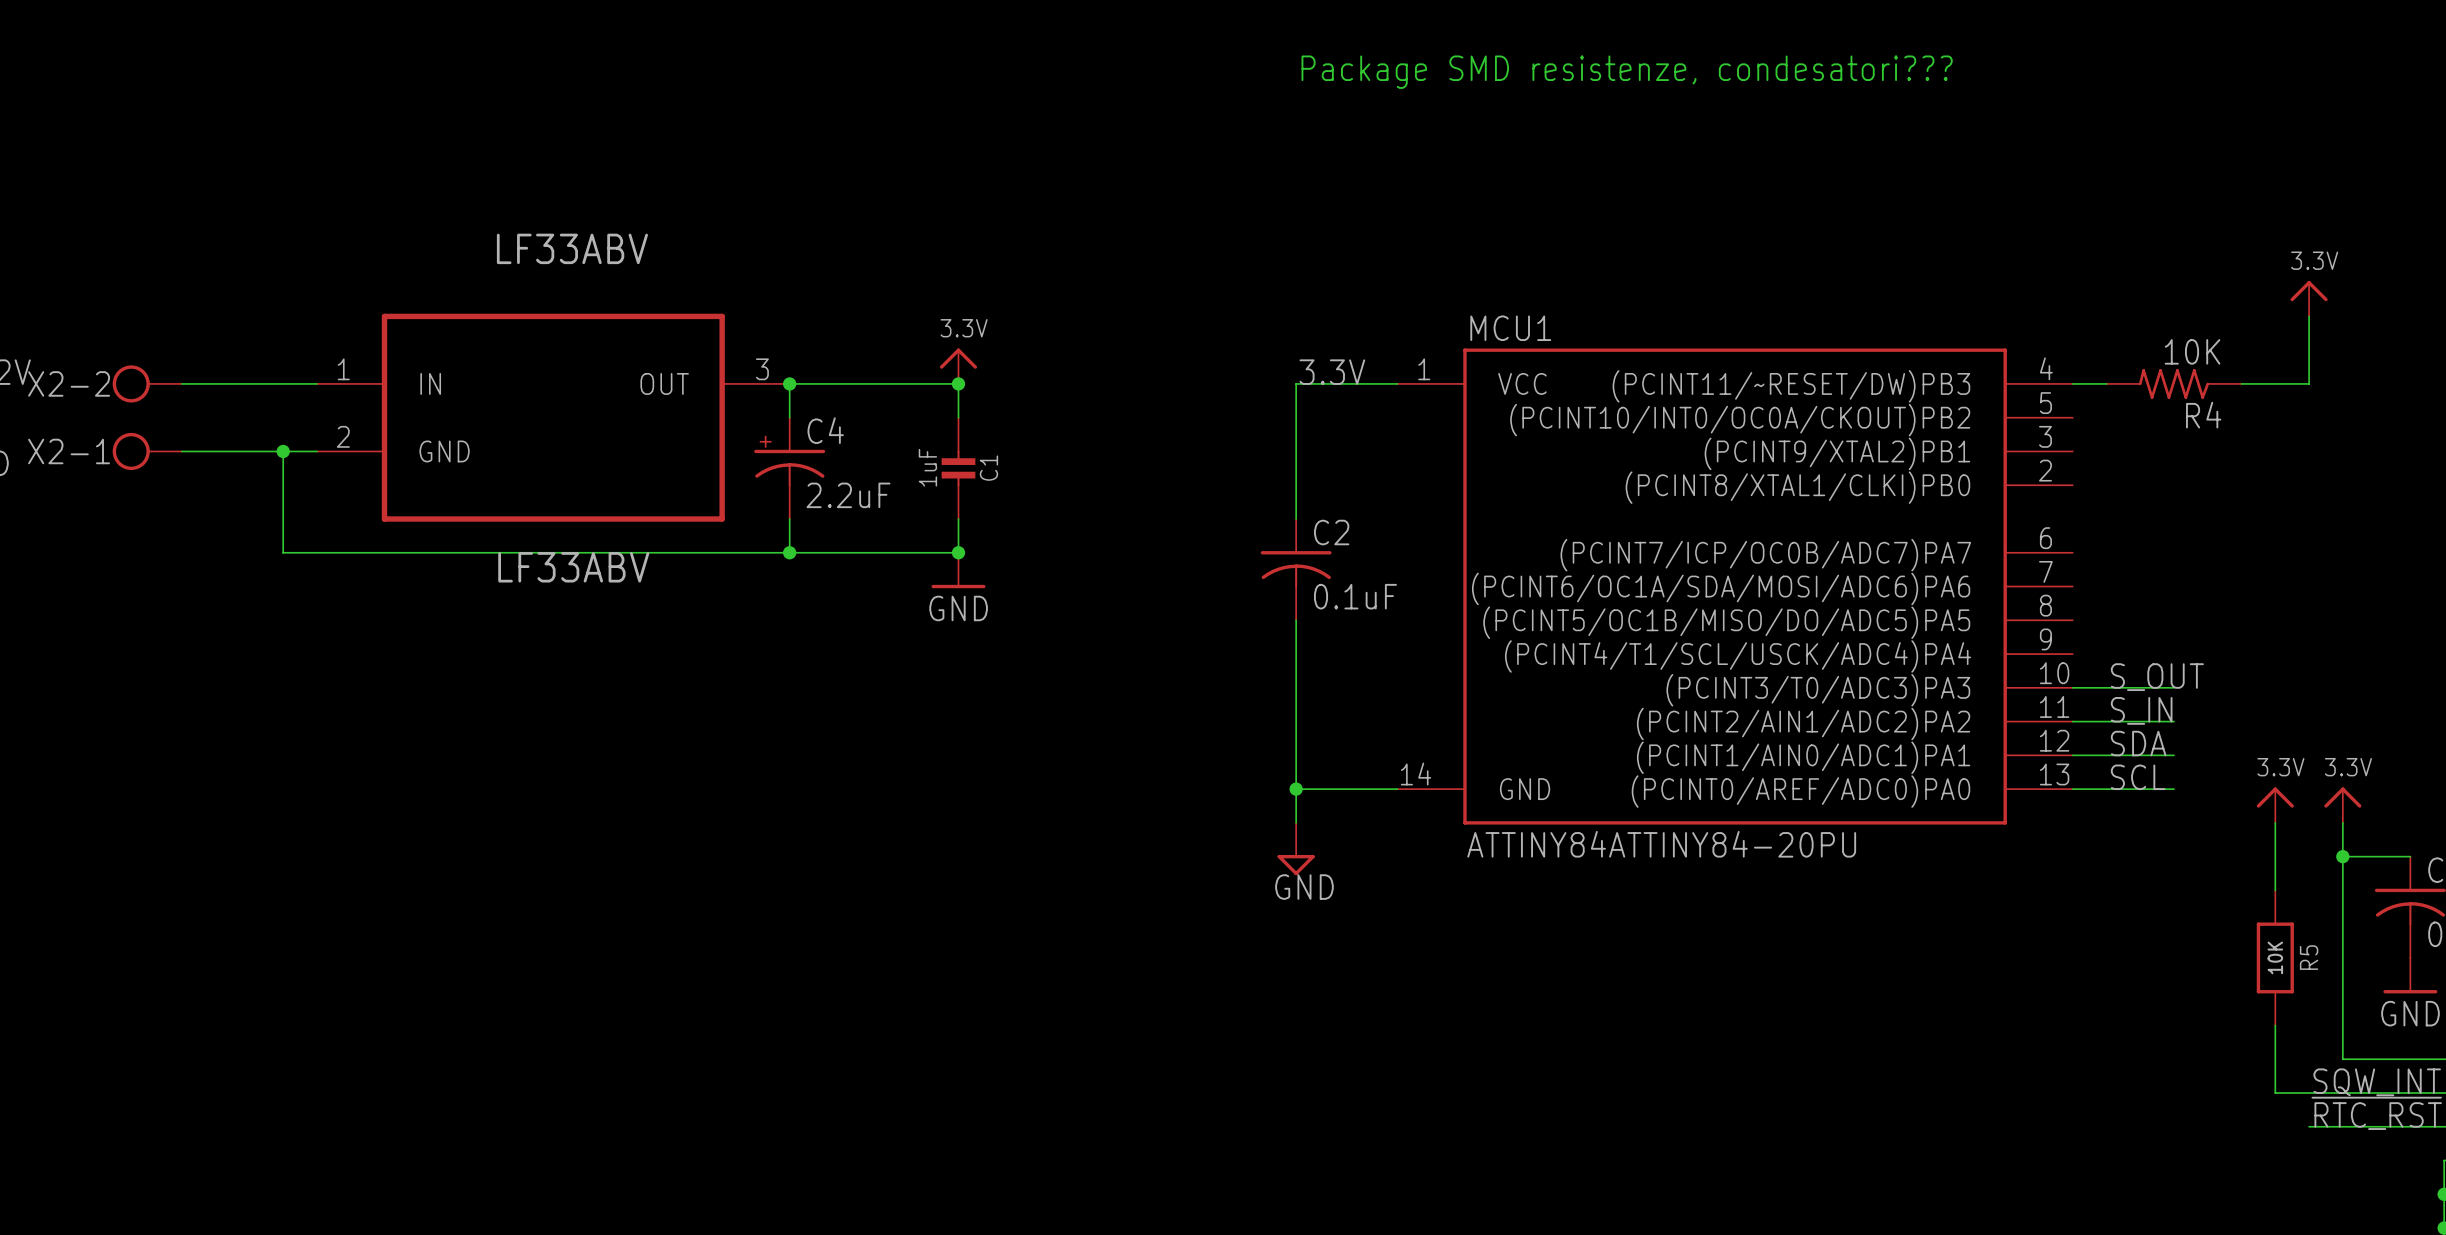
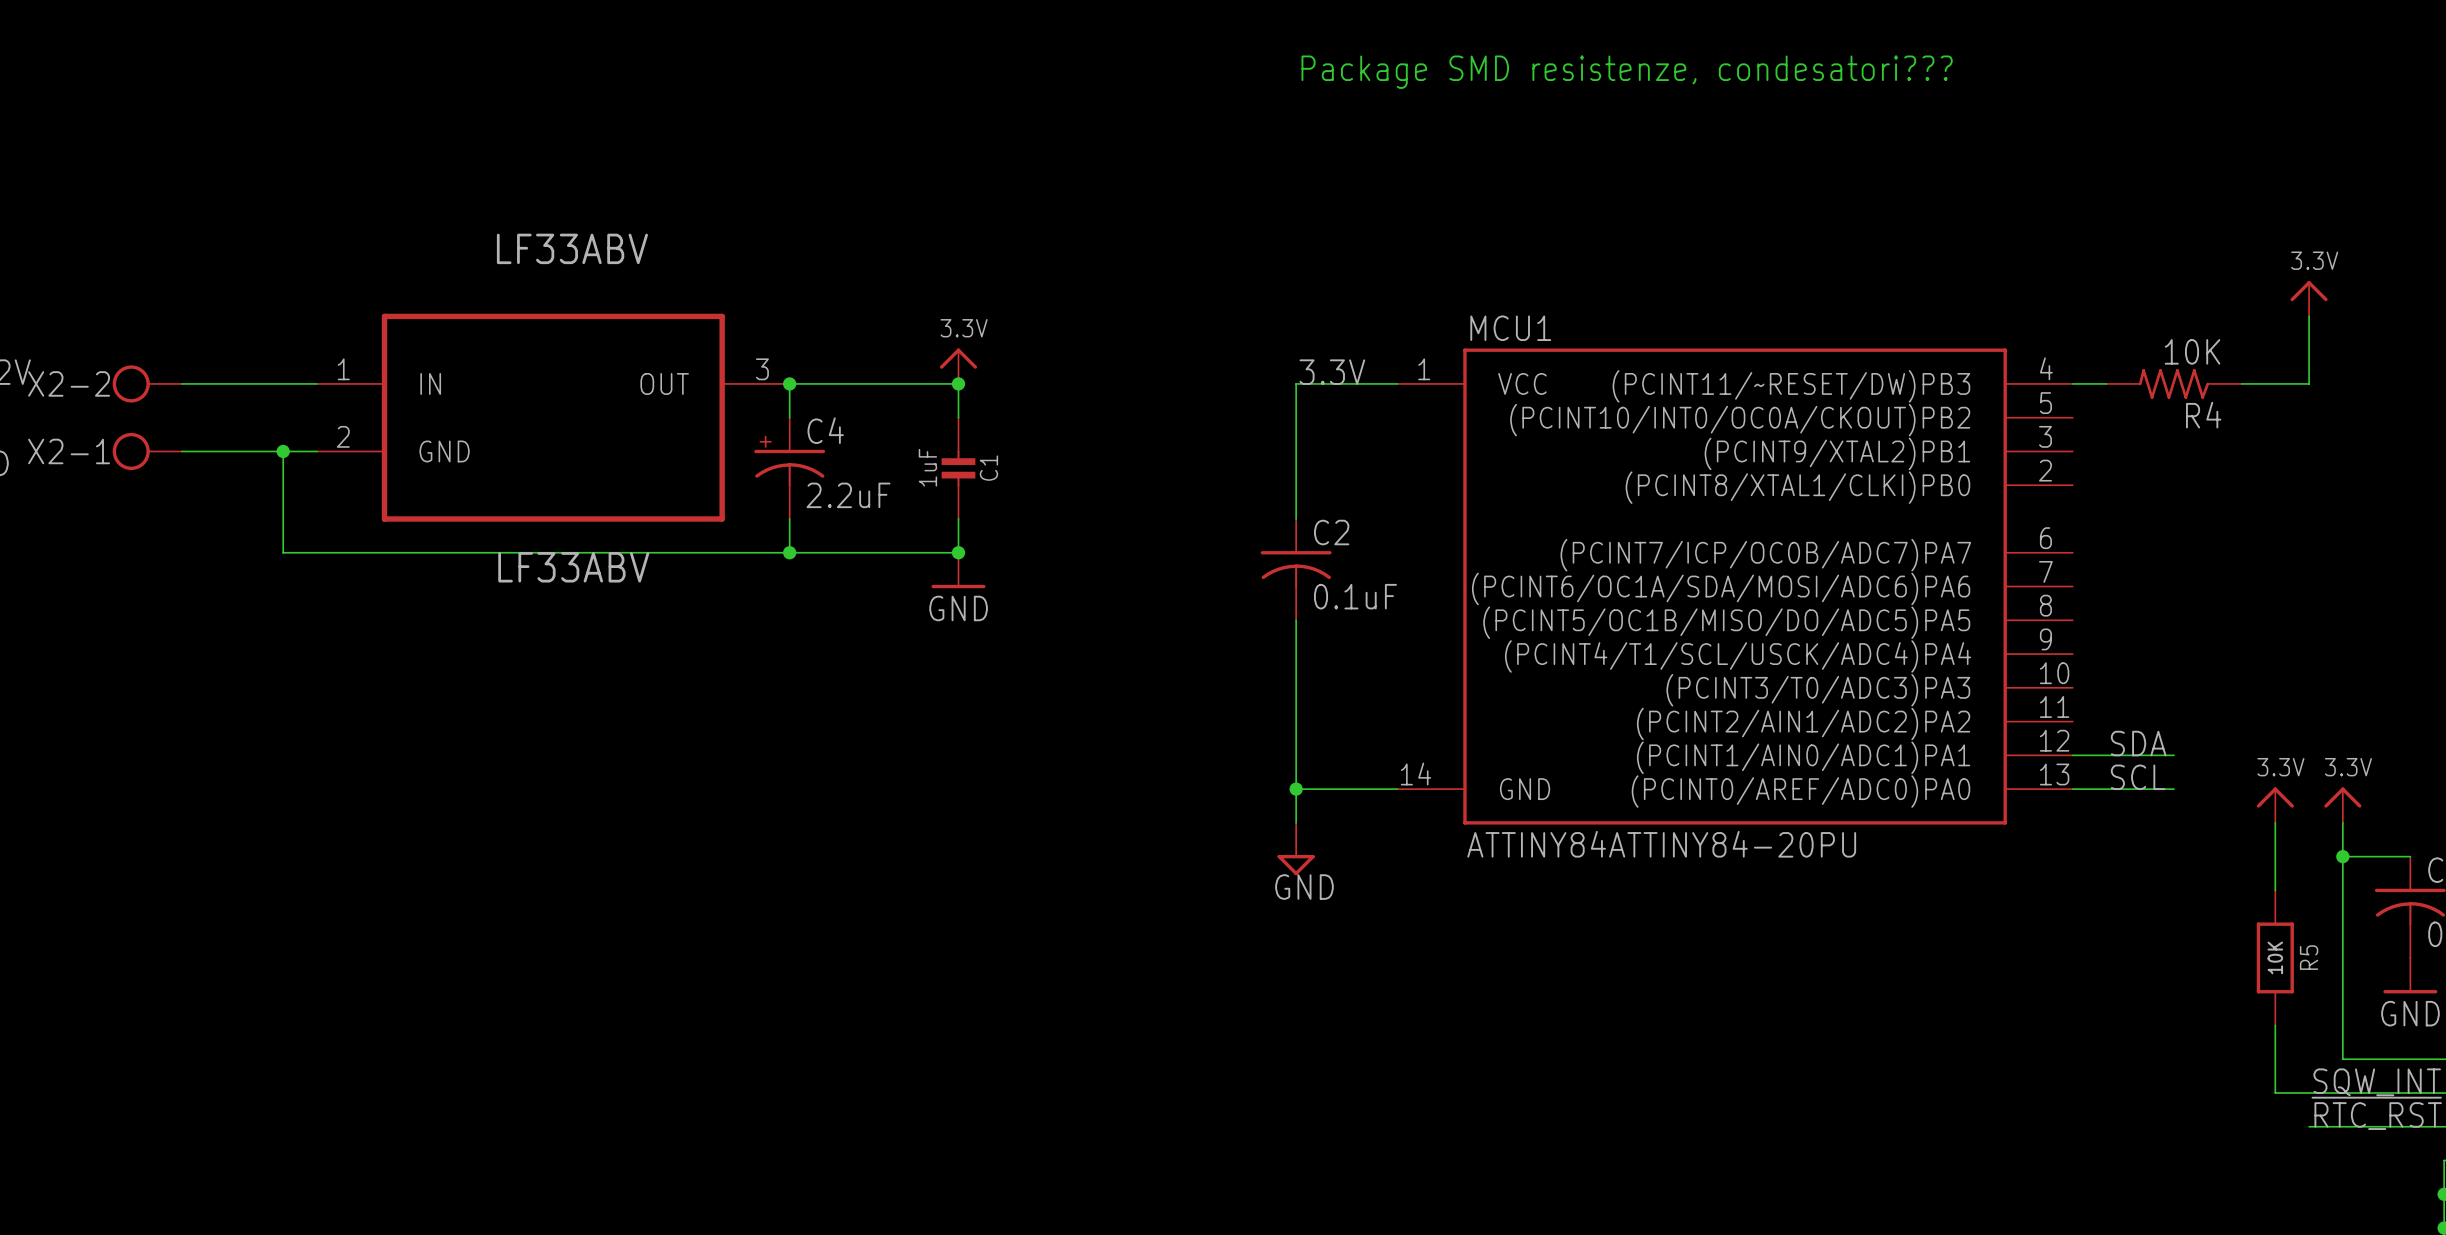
label: S_OUT (2157, 677) -> none
wire: (2072, 687) (2174, 687) -> none
label: S_IN (2141, 710) -> none
wire: (2072, 721) (2174, 721) -> none

